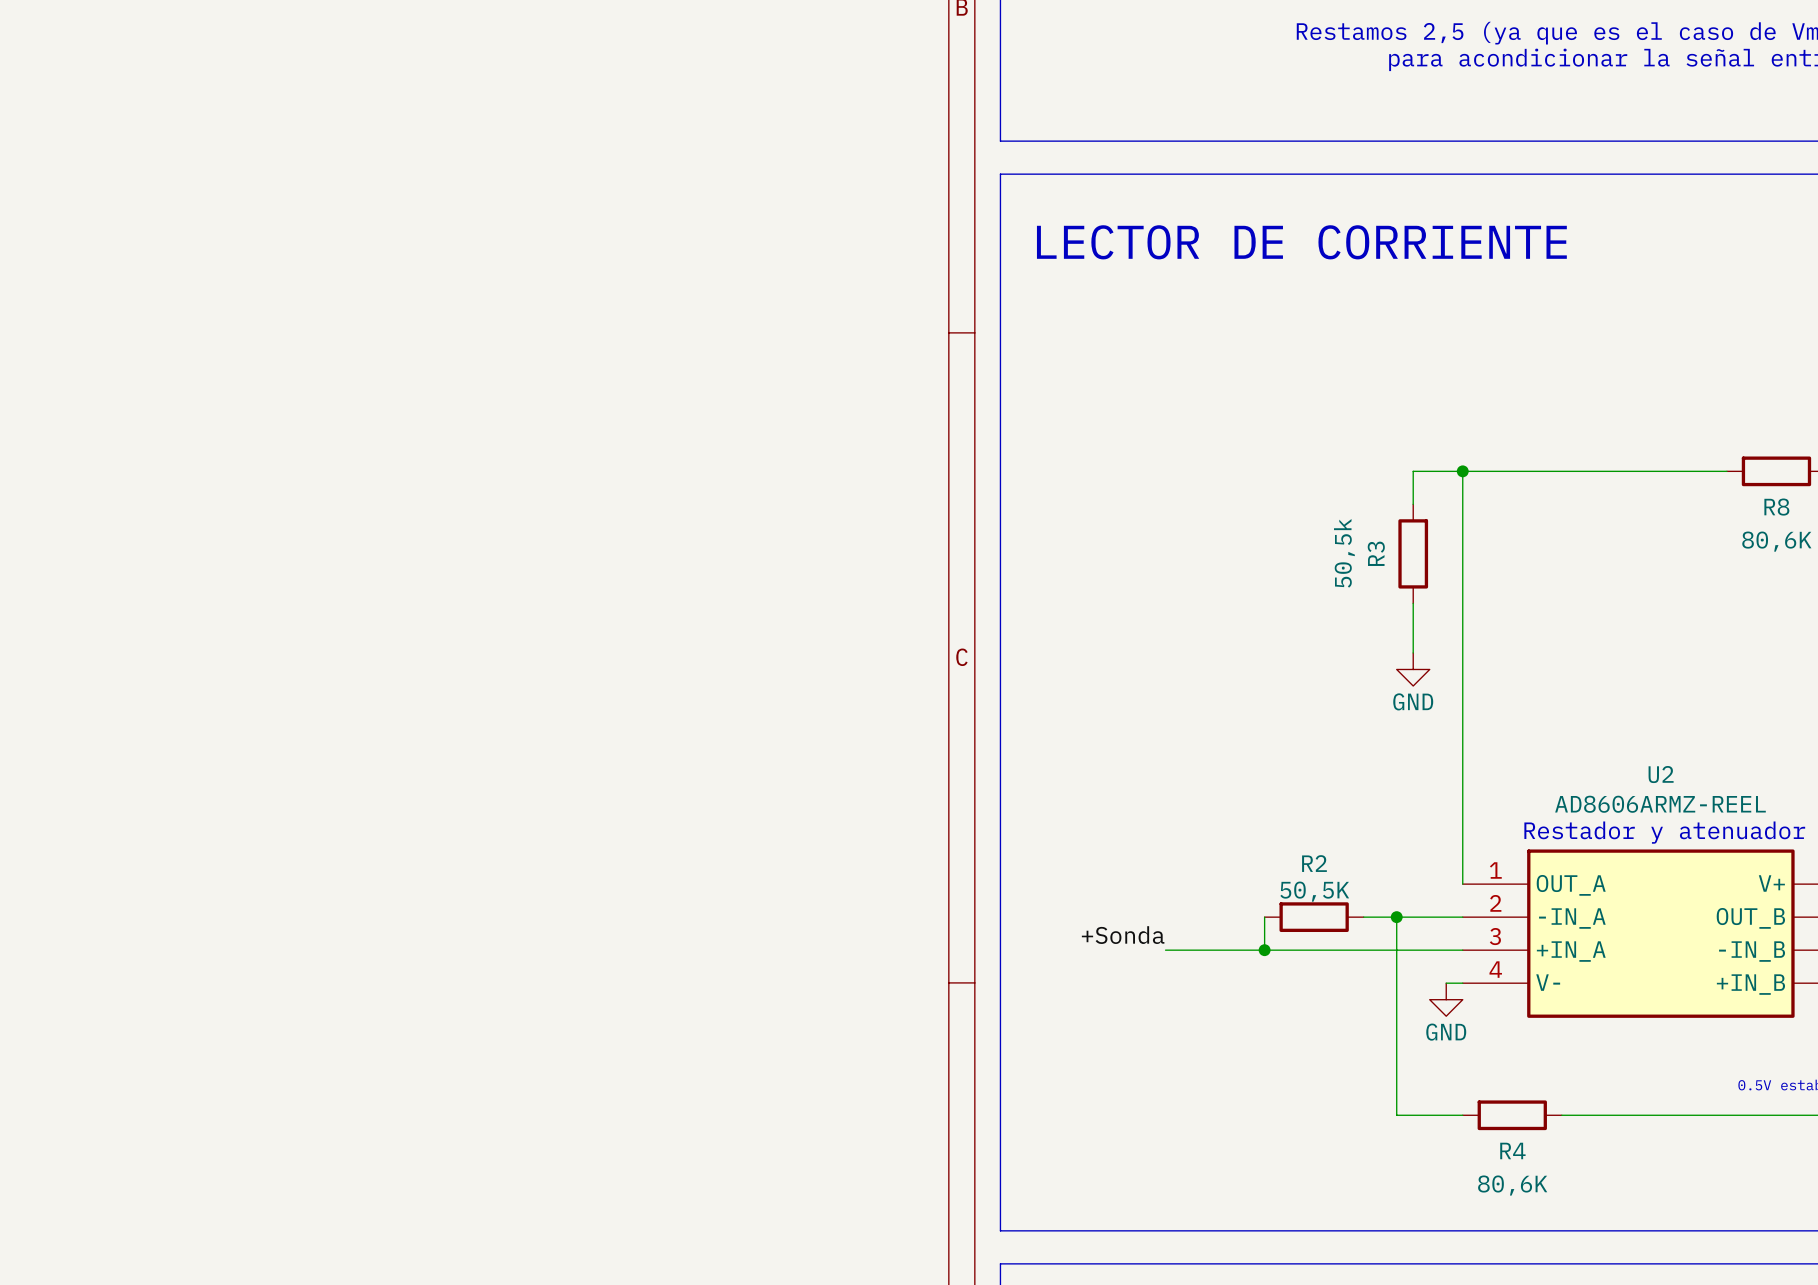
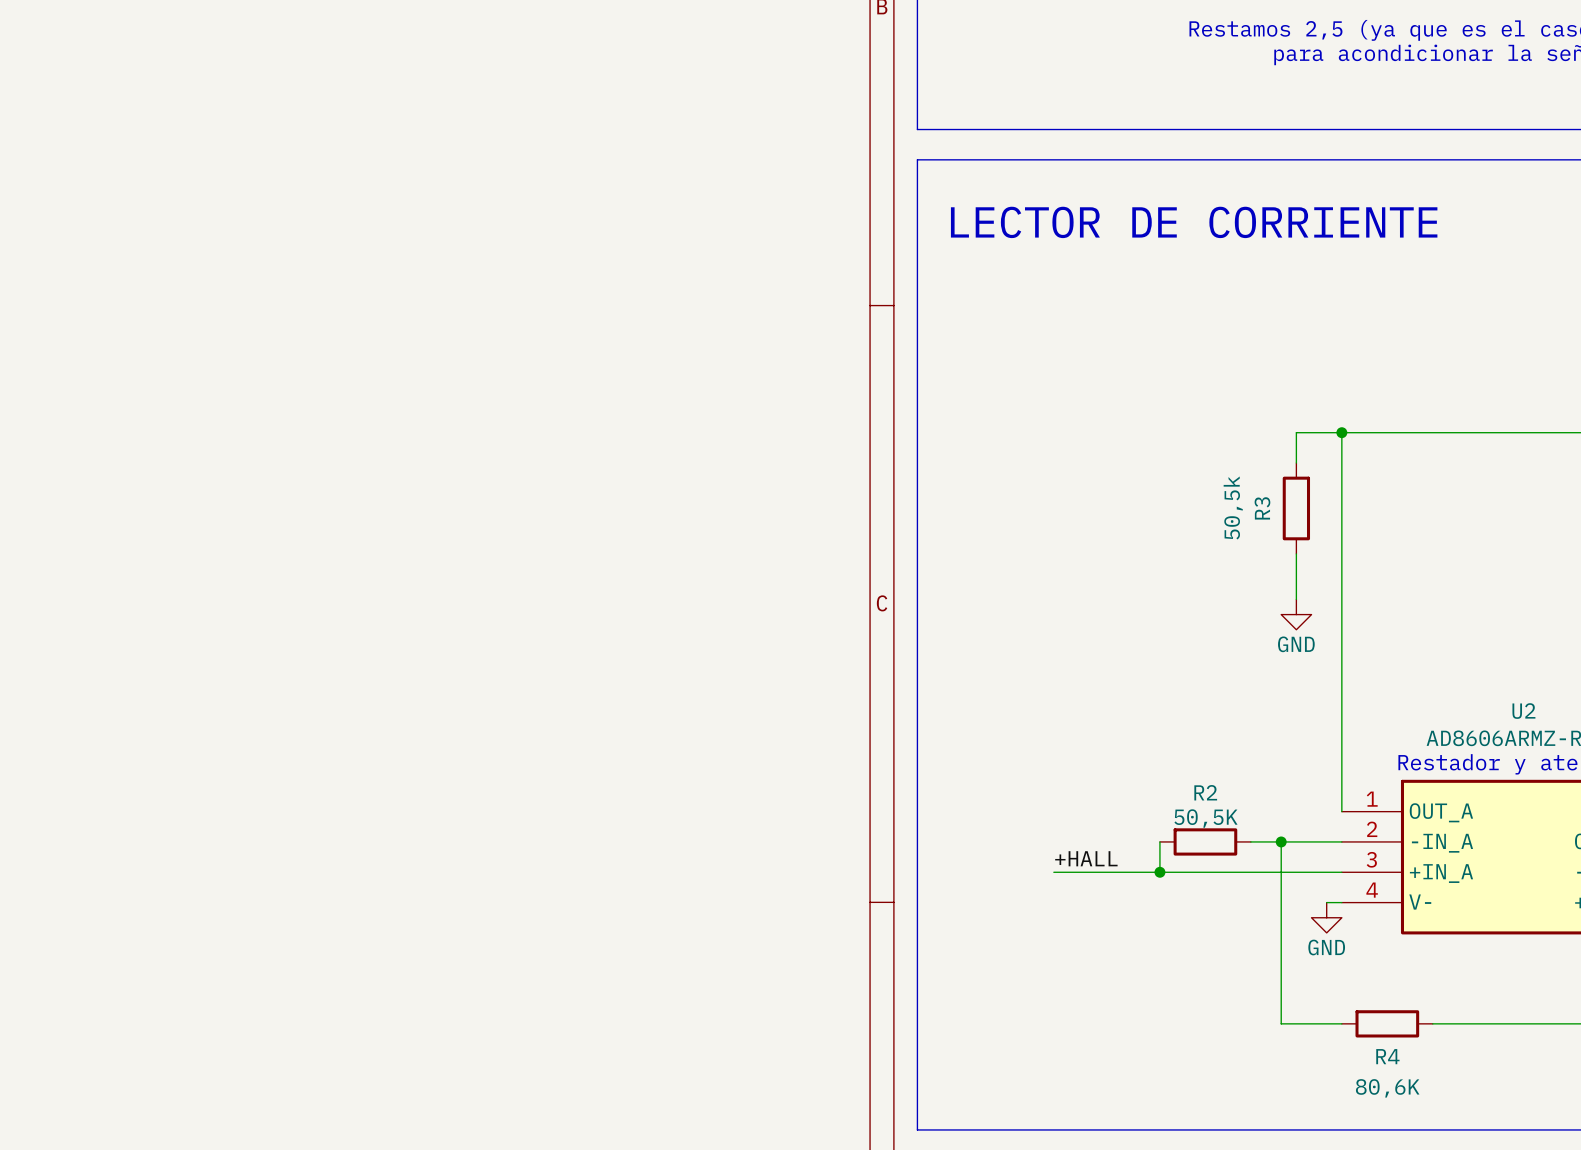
label: +Sonda (1123, 935) -> none
label: none -> +HALL (1086, 858)
wire: none -> (1053, 872) (1069, 872)

